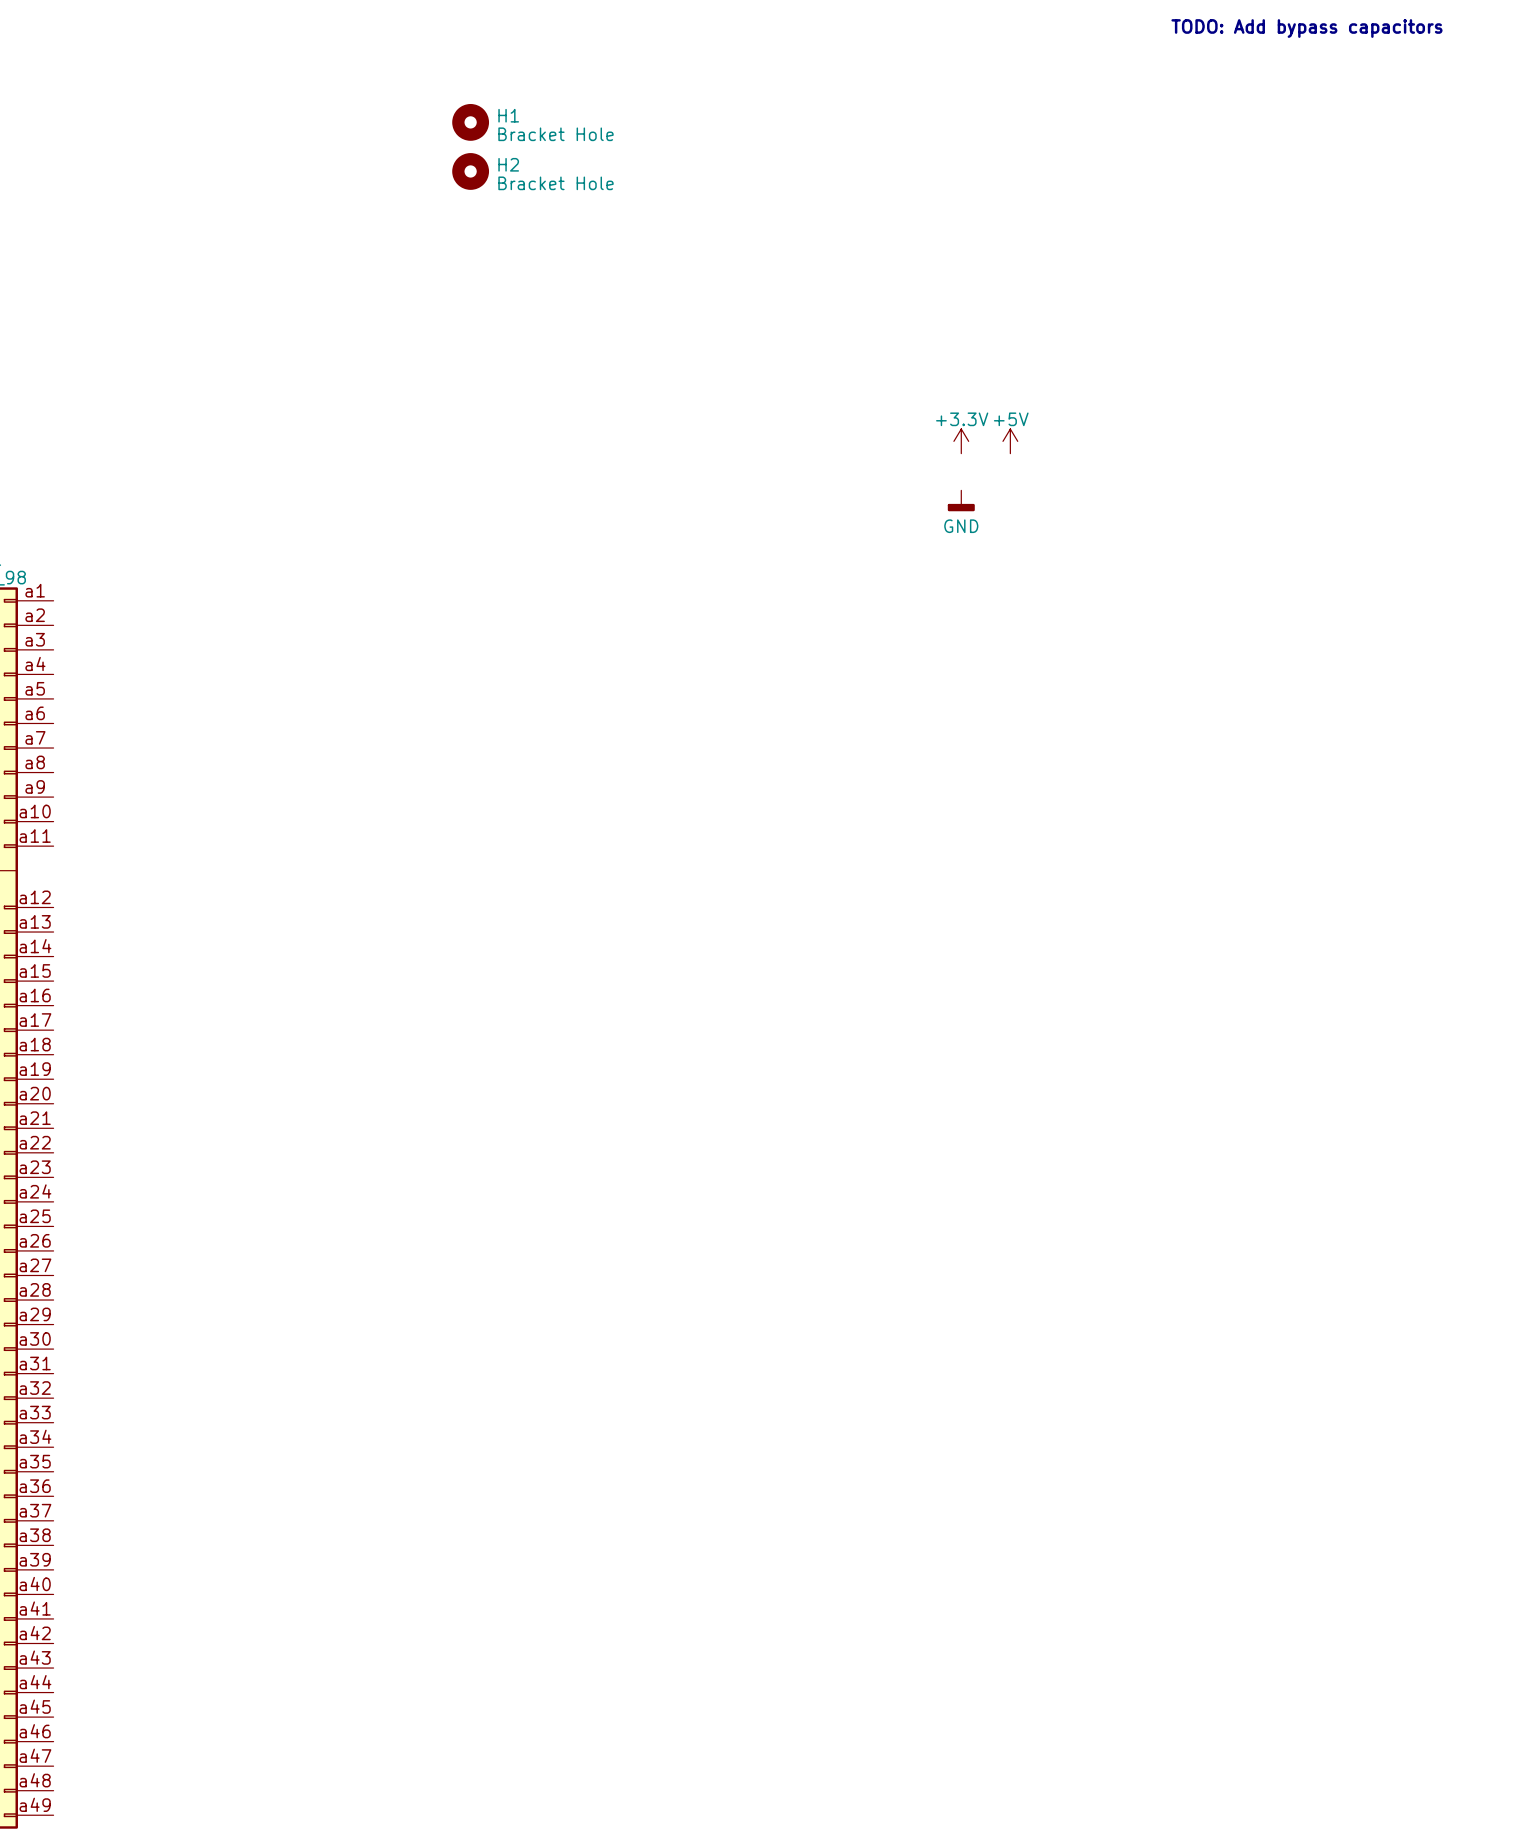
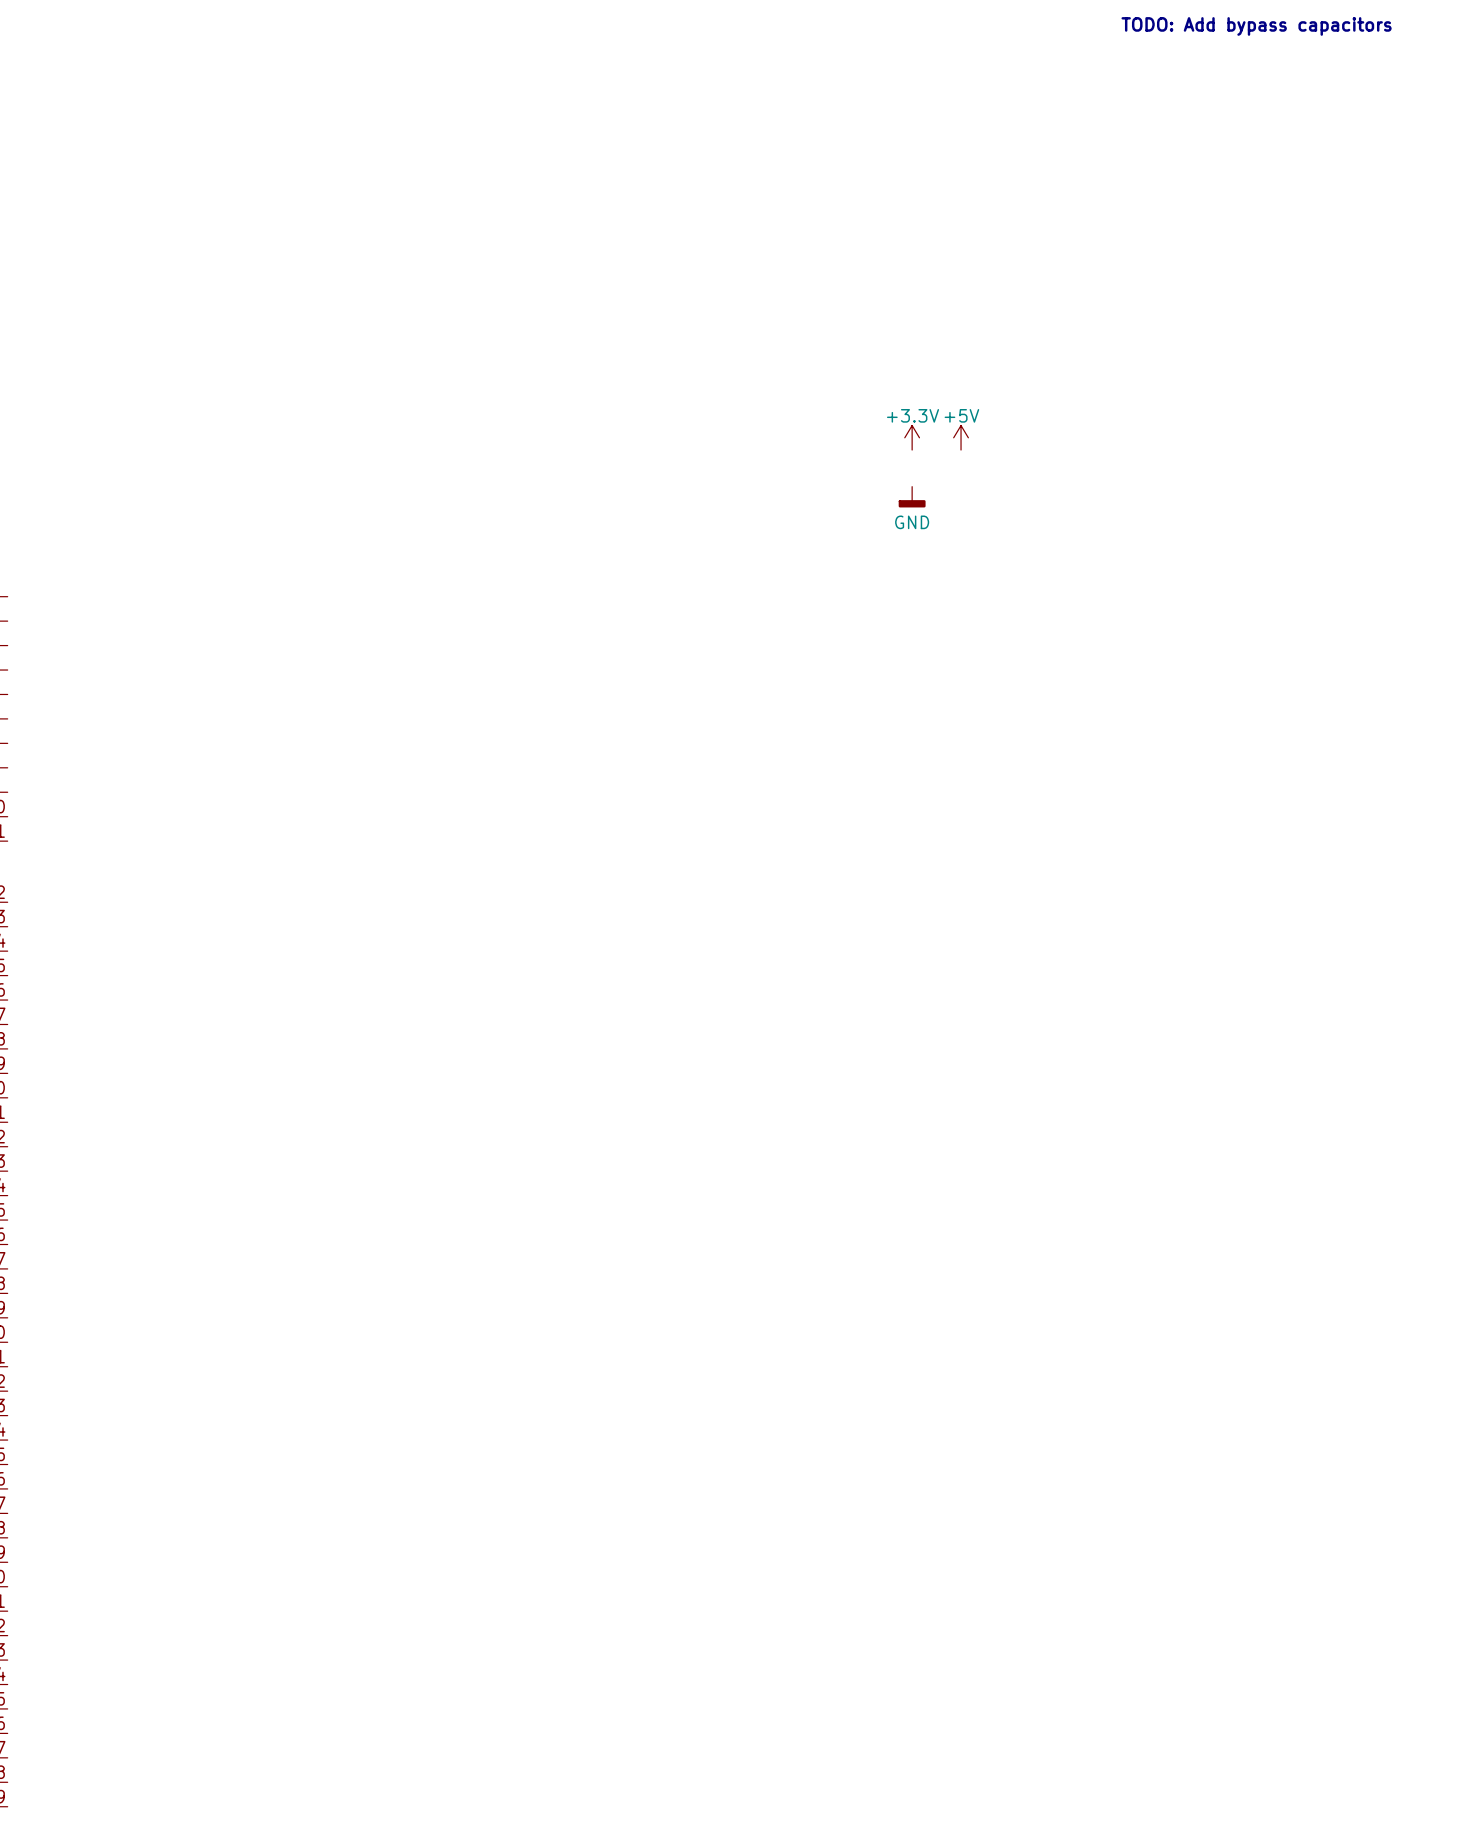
H1: Bracket Hole (470, 122) -> none
H2: Bracket Hole (470, 171) -> none

